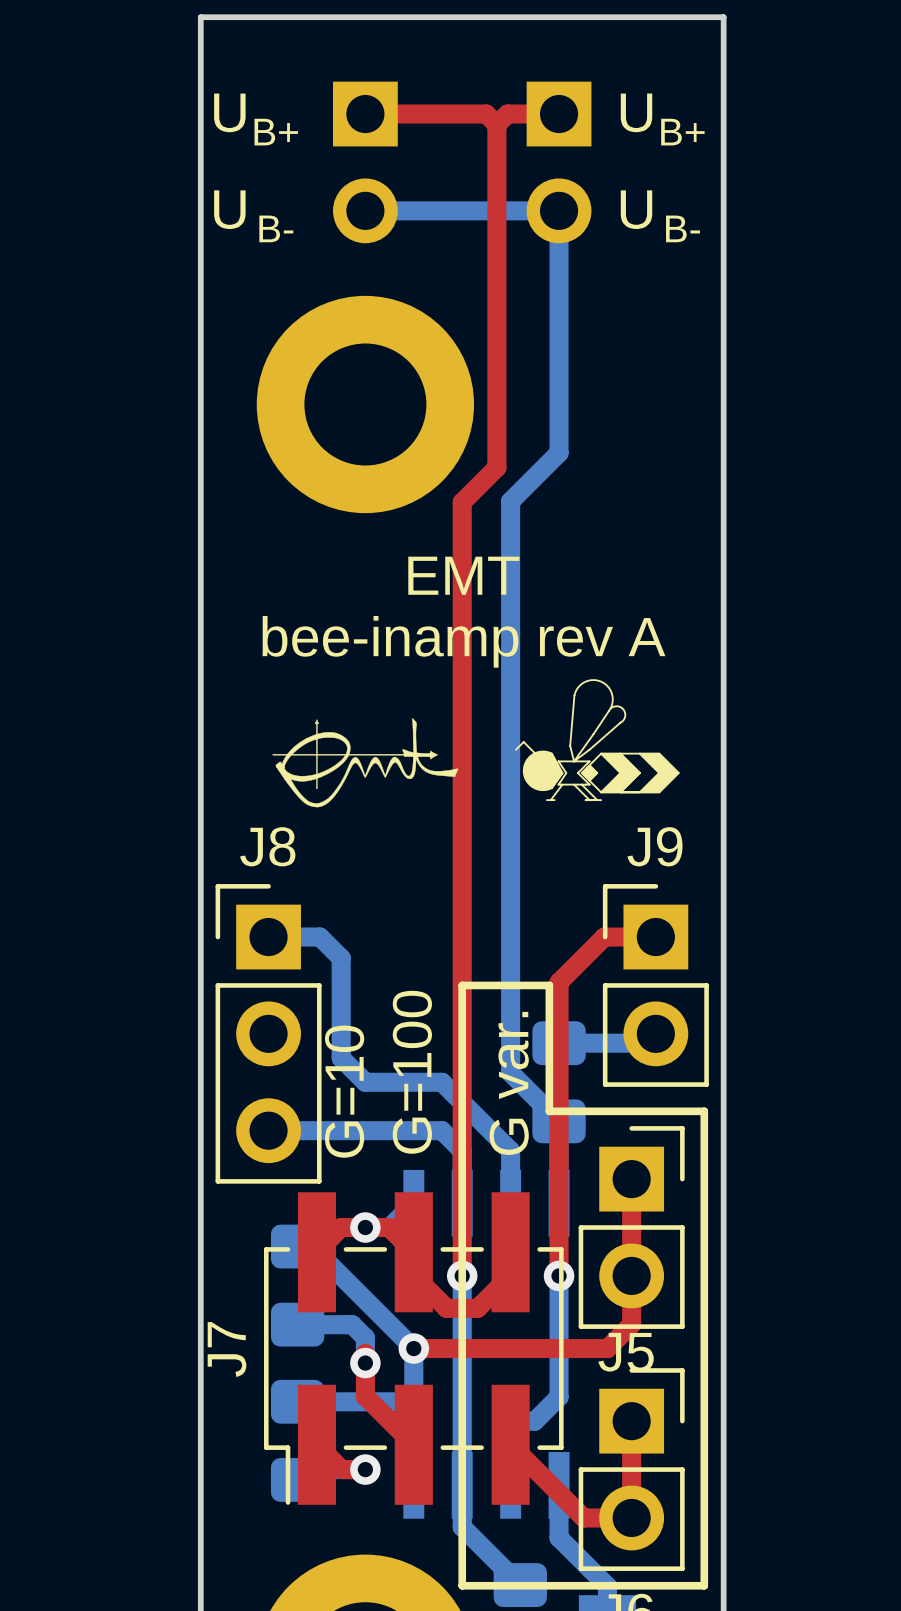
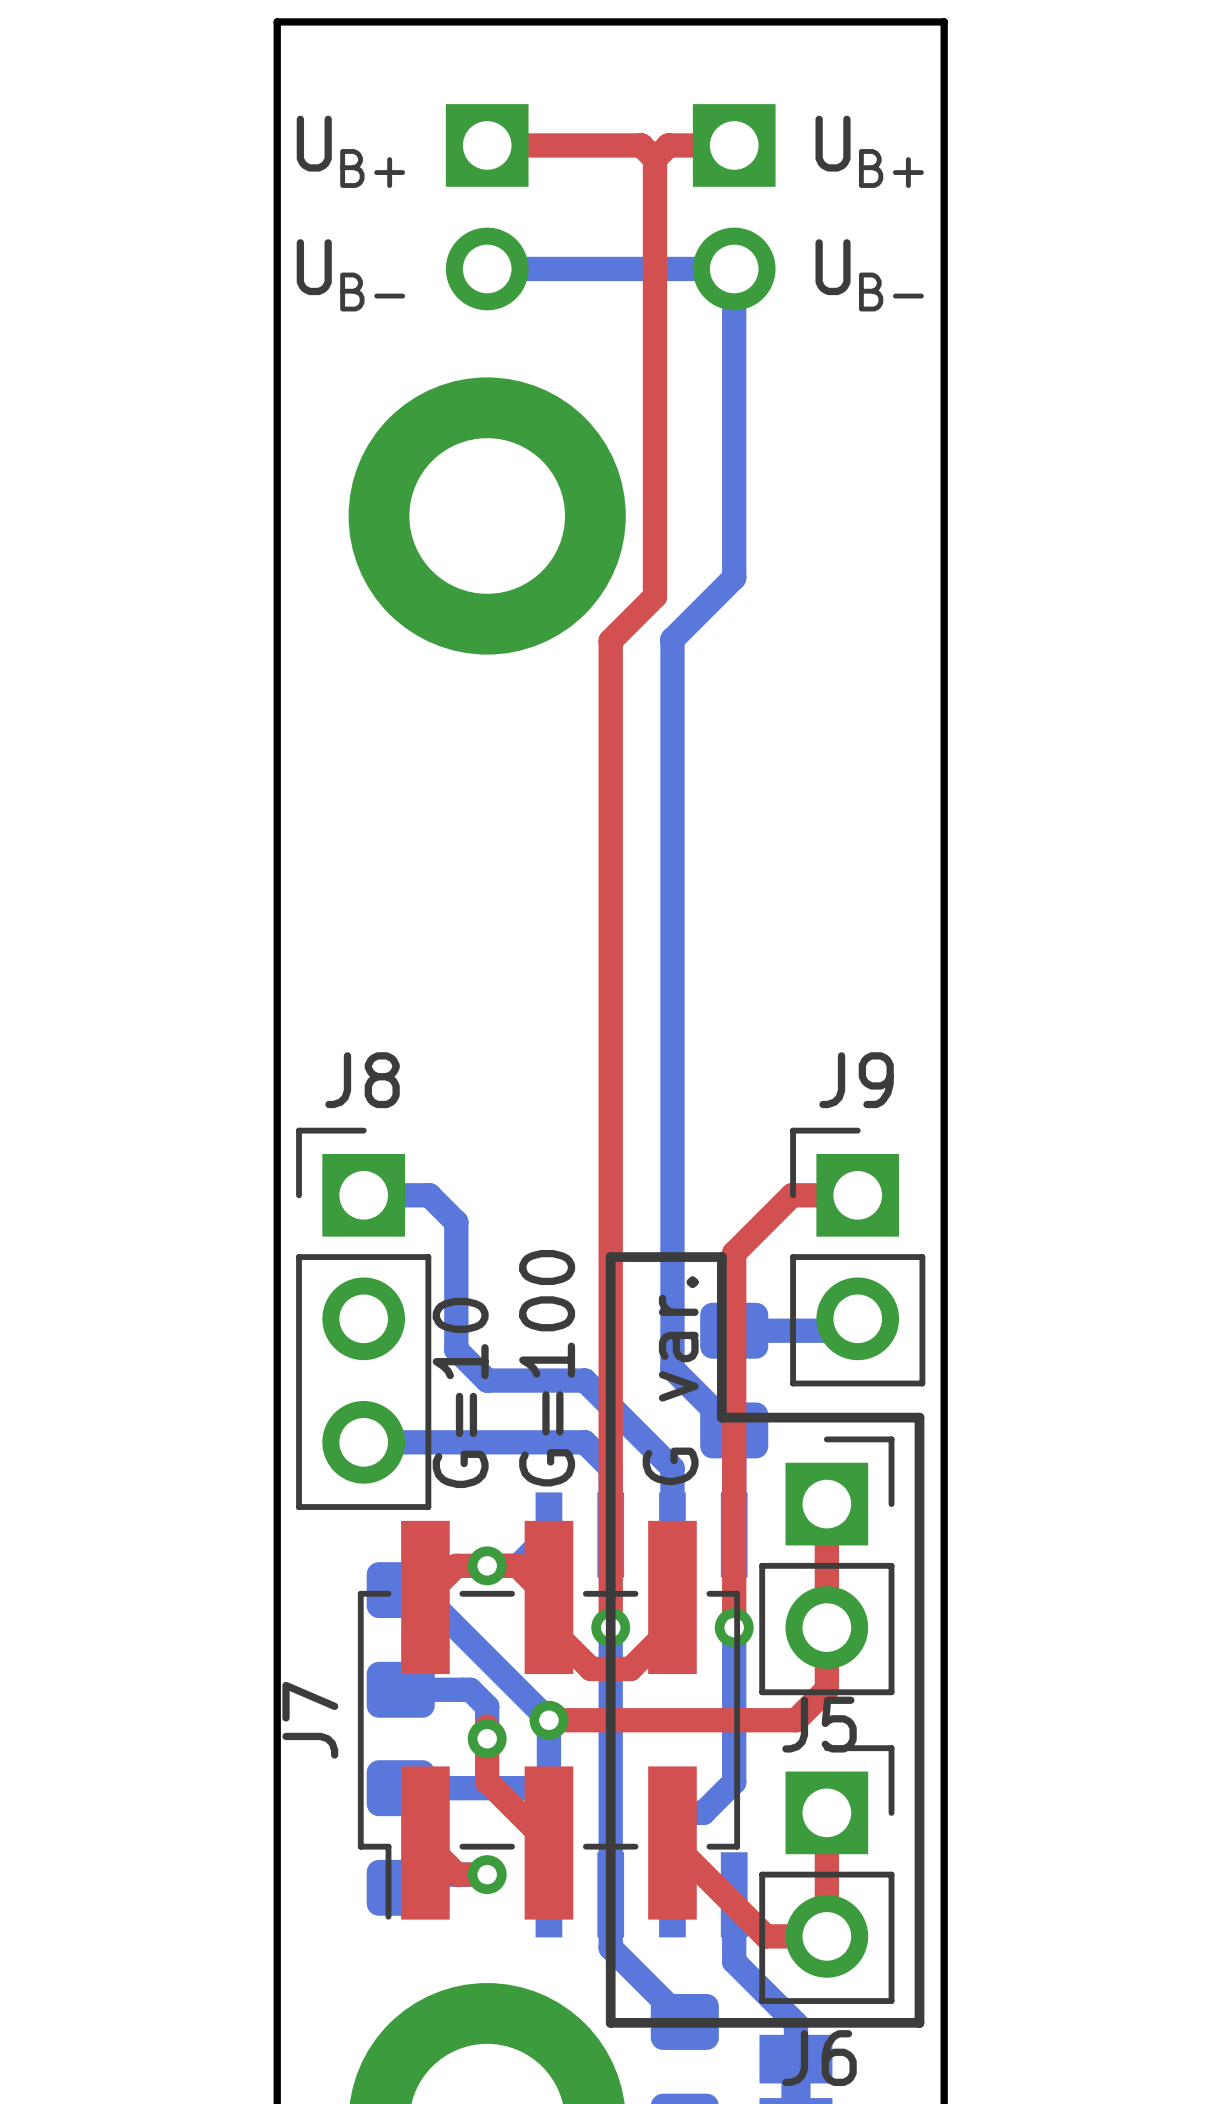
text: EMT (463, 575) -> none
text: bee-inamp rev A (463, 641) -> none
drawing: [515, 679, 680, 802] -> none
drawing: [272, 718, 459, 808] -> none

